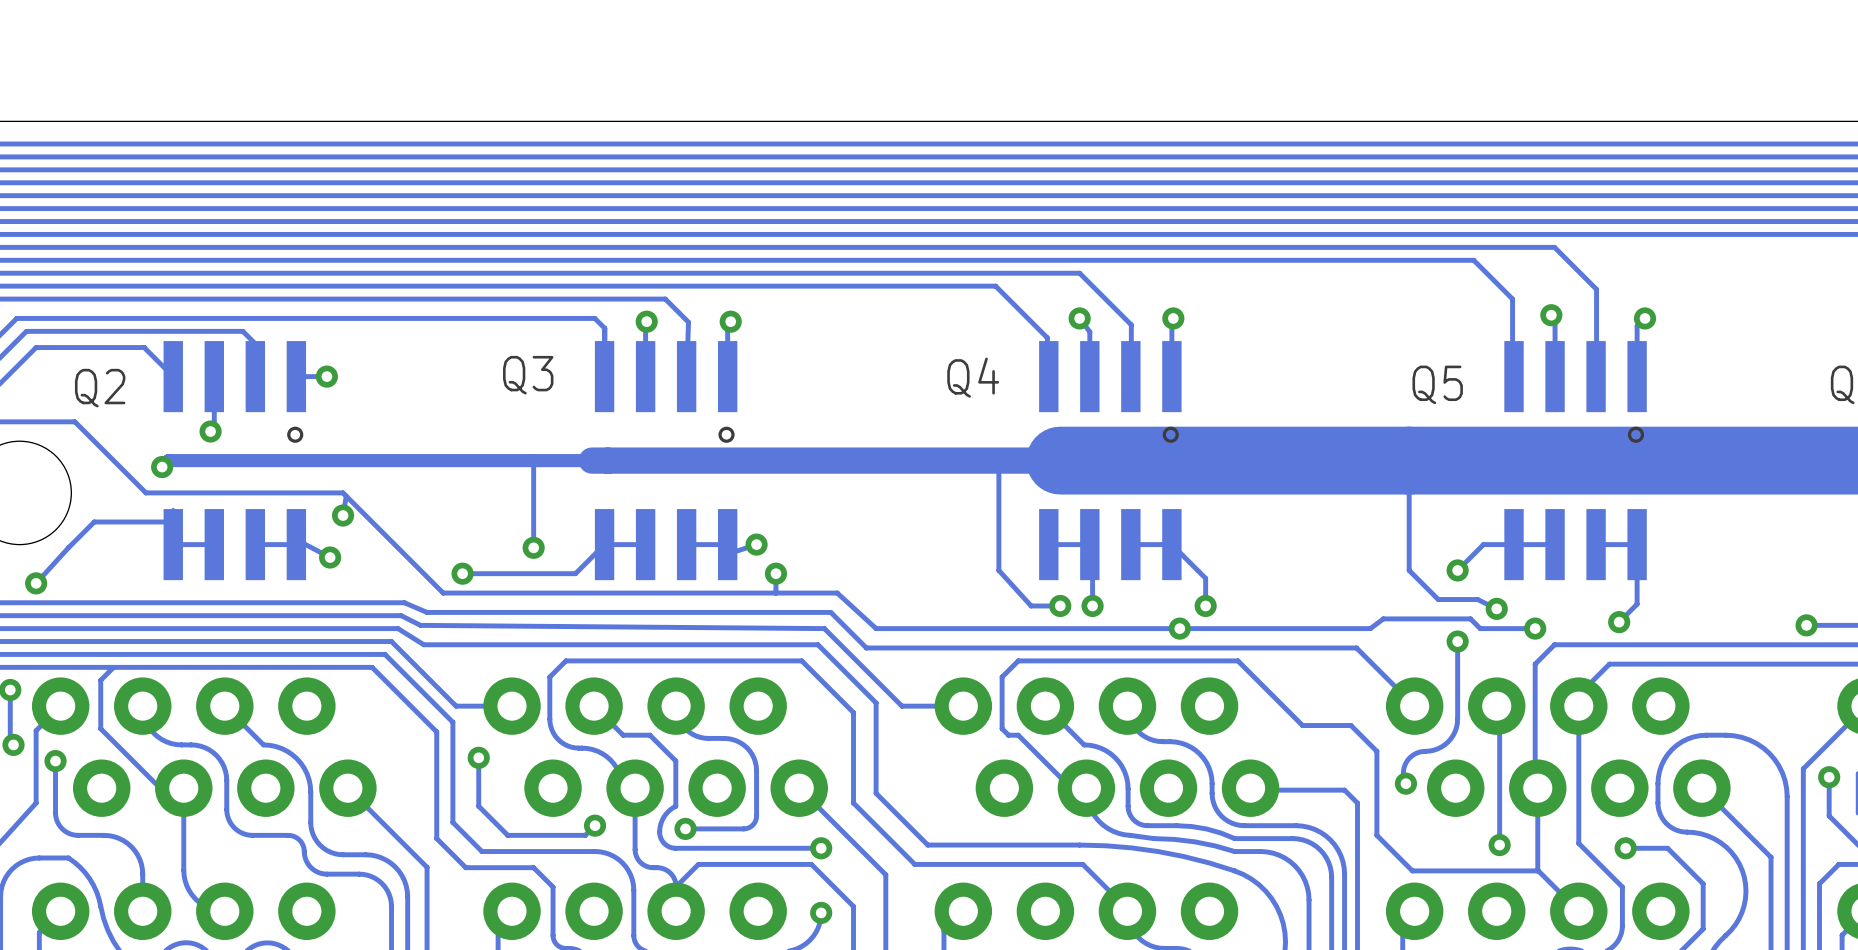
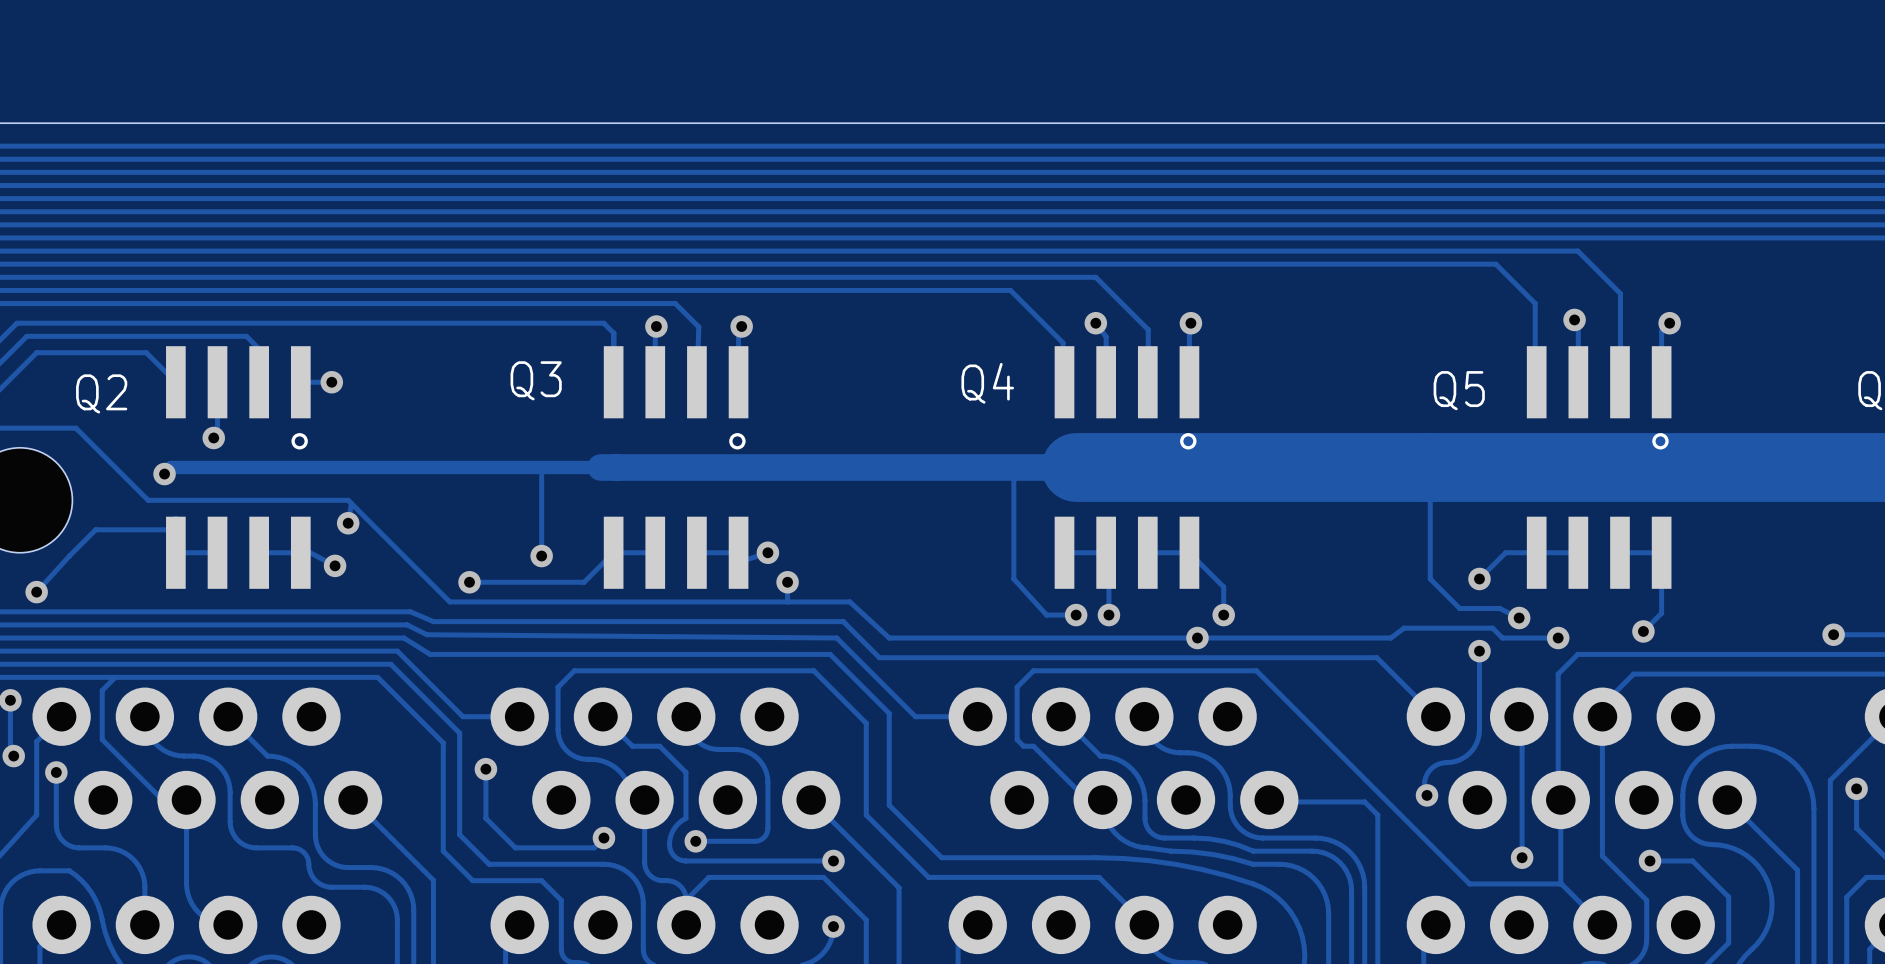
track: (1302, 725) (1351, 725) (1376, 751) (1376, 835) (1412, 870) (1447, 870) -> (1322, 736) (1469, 883)

